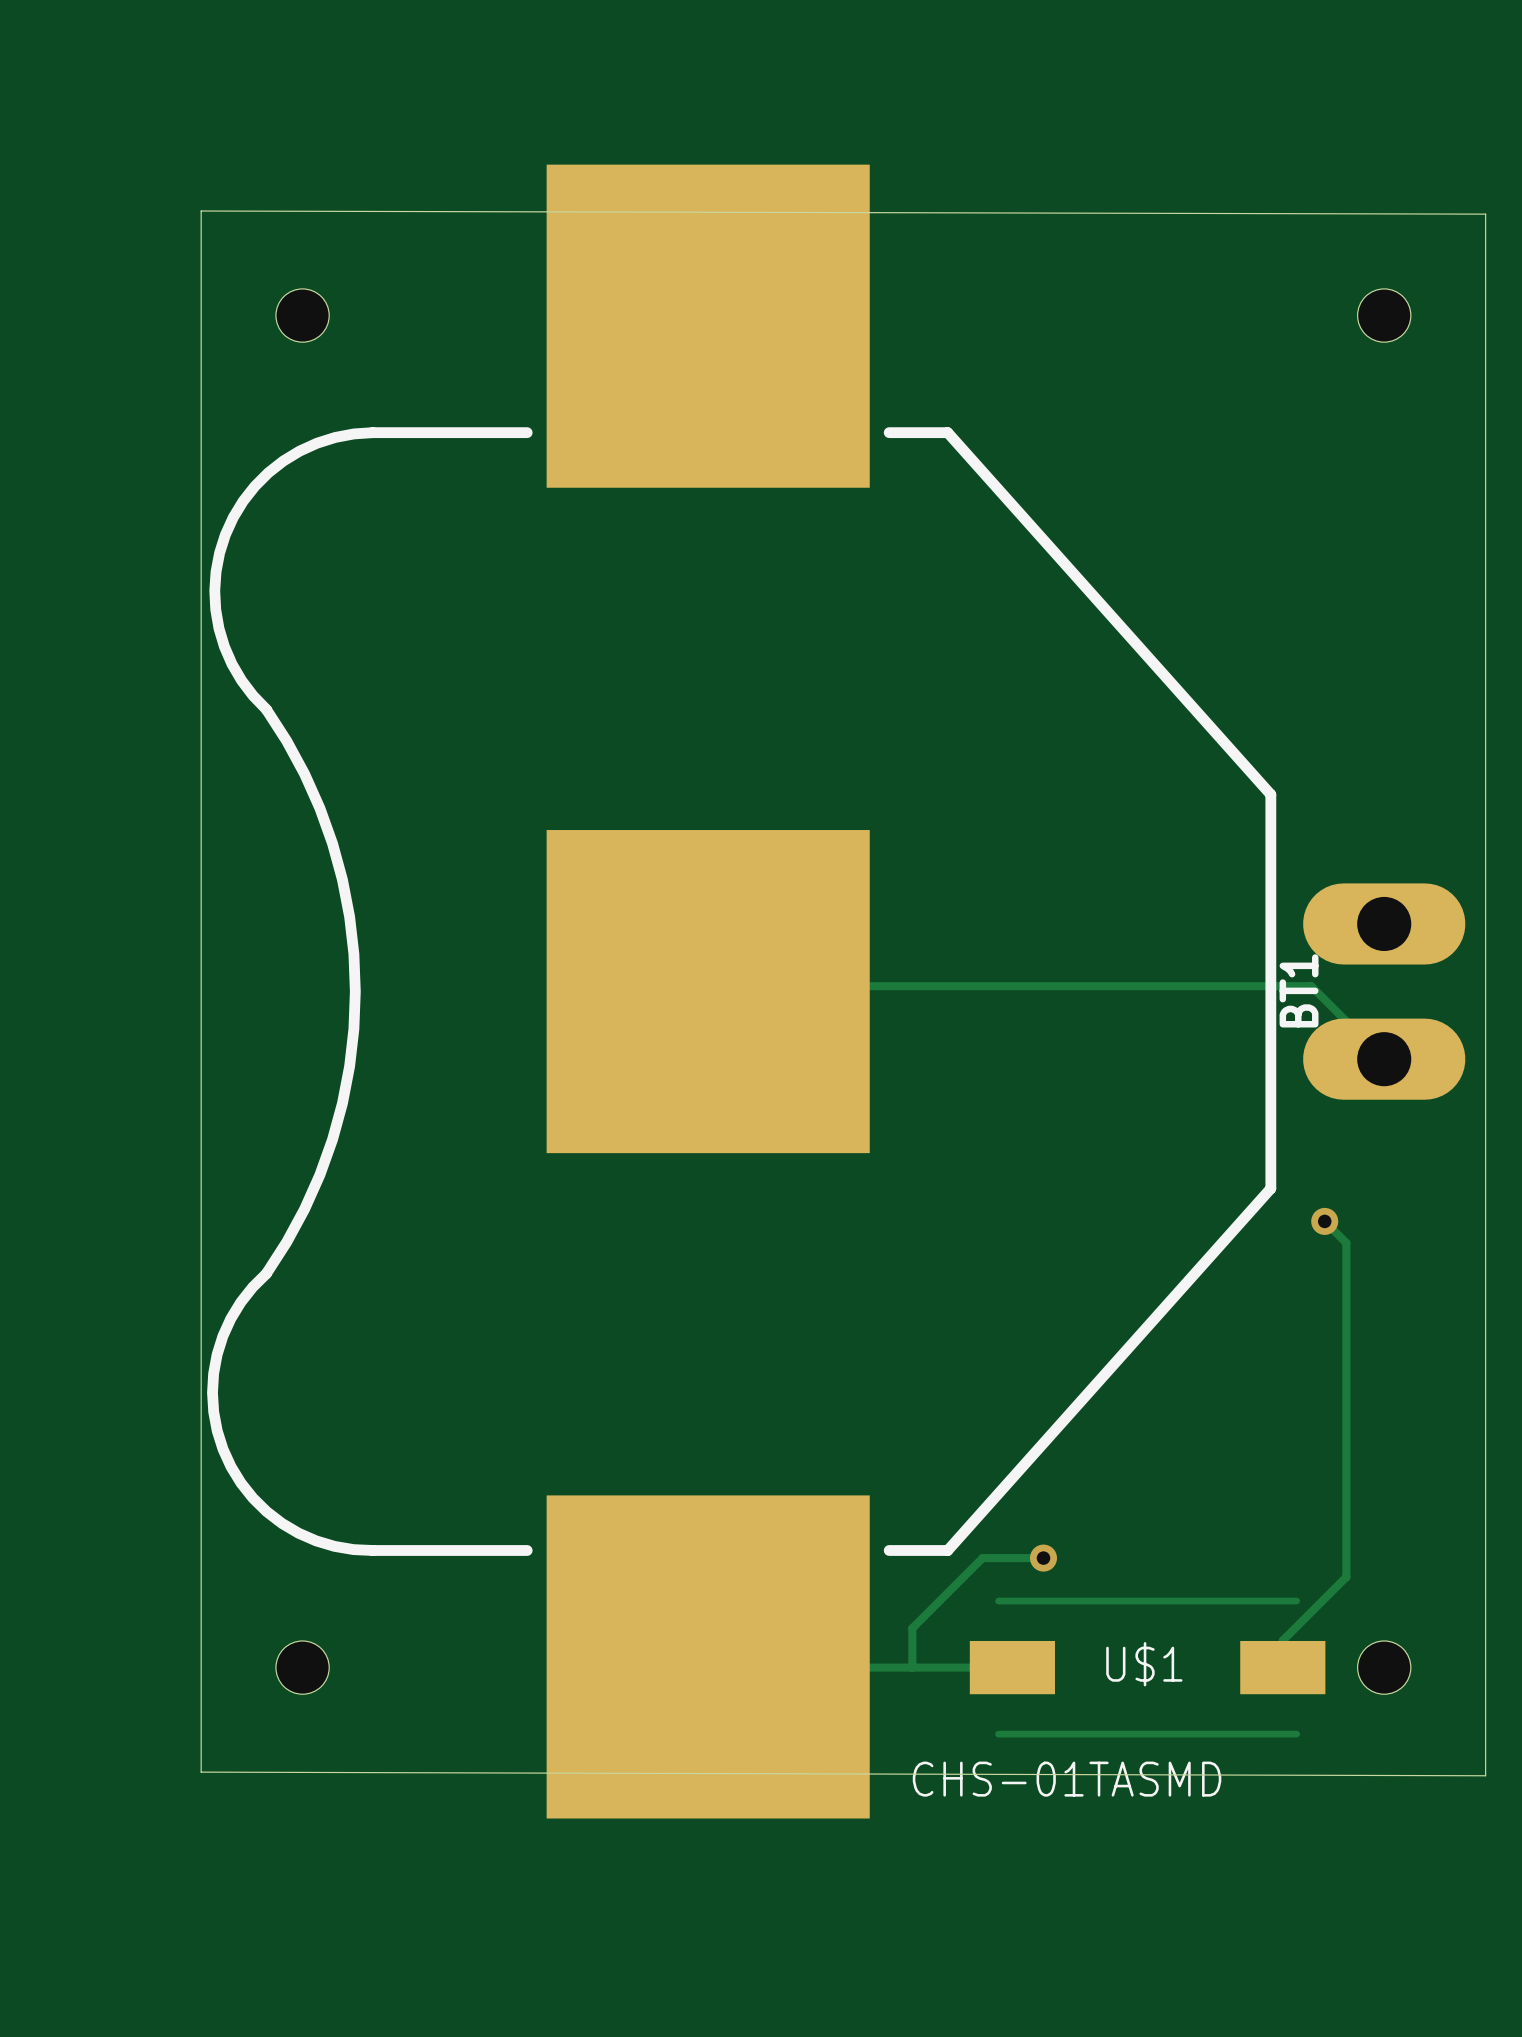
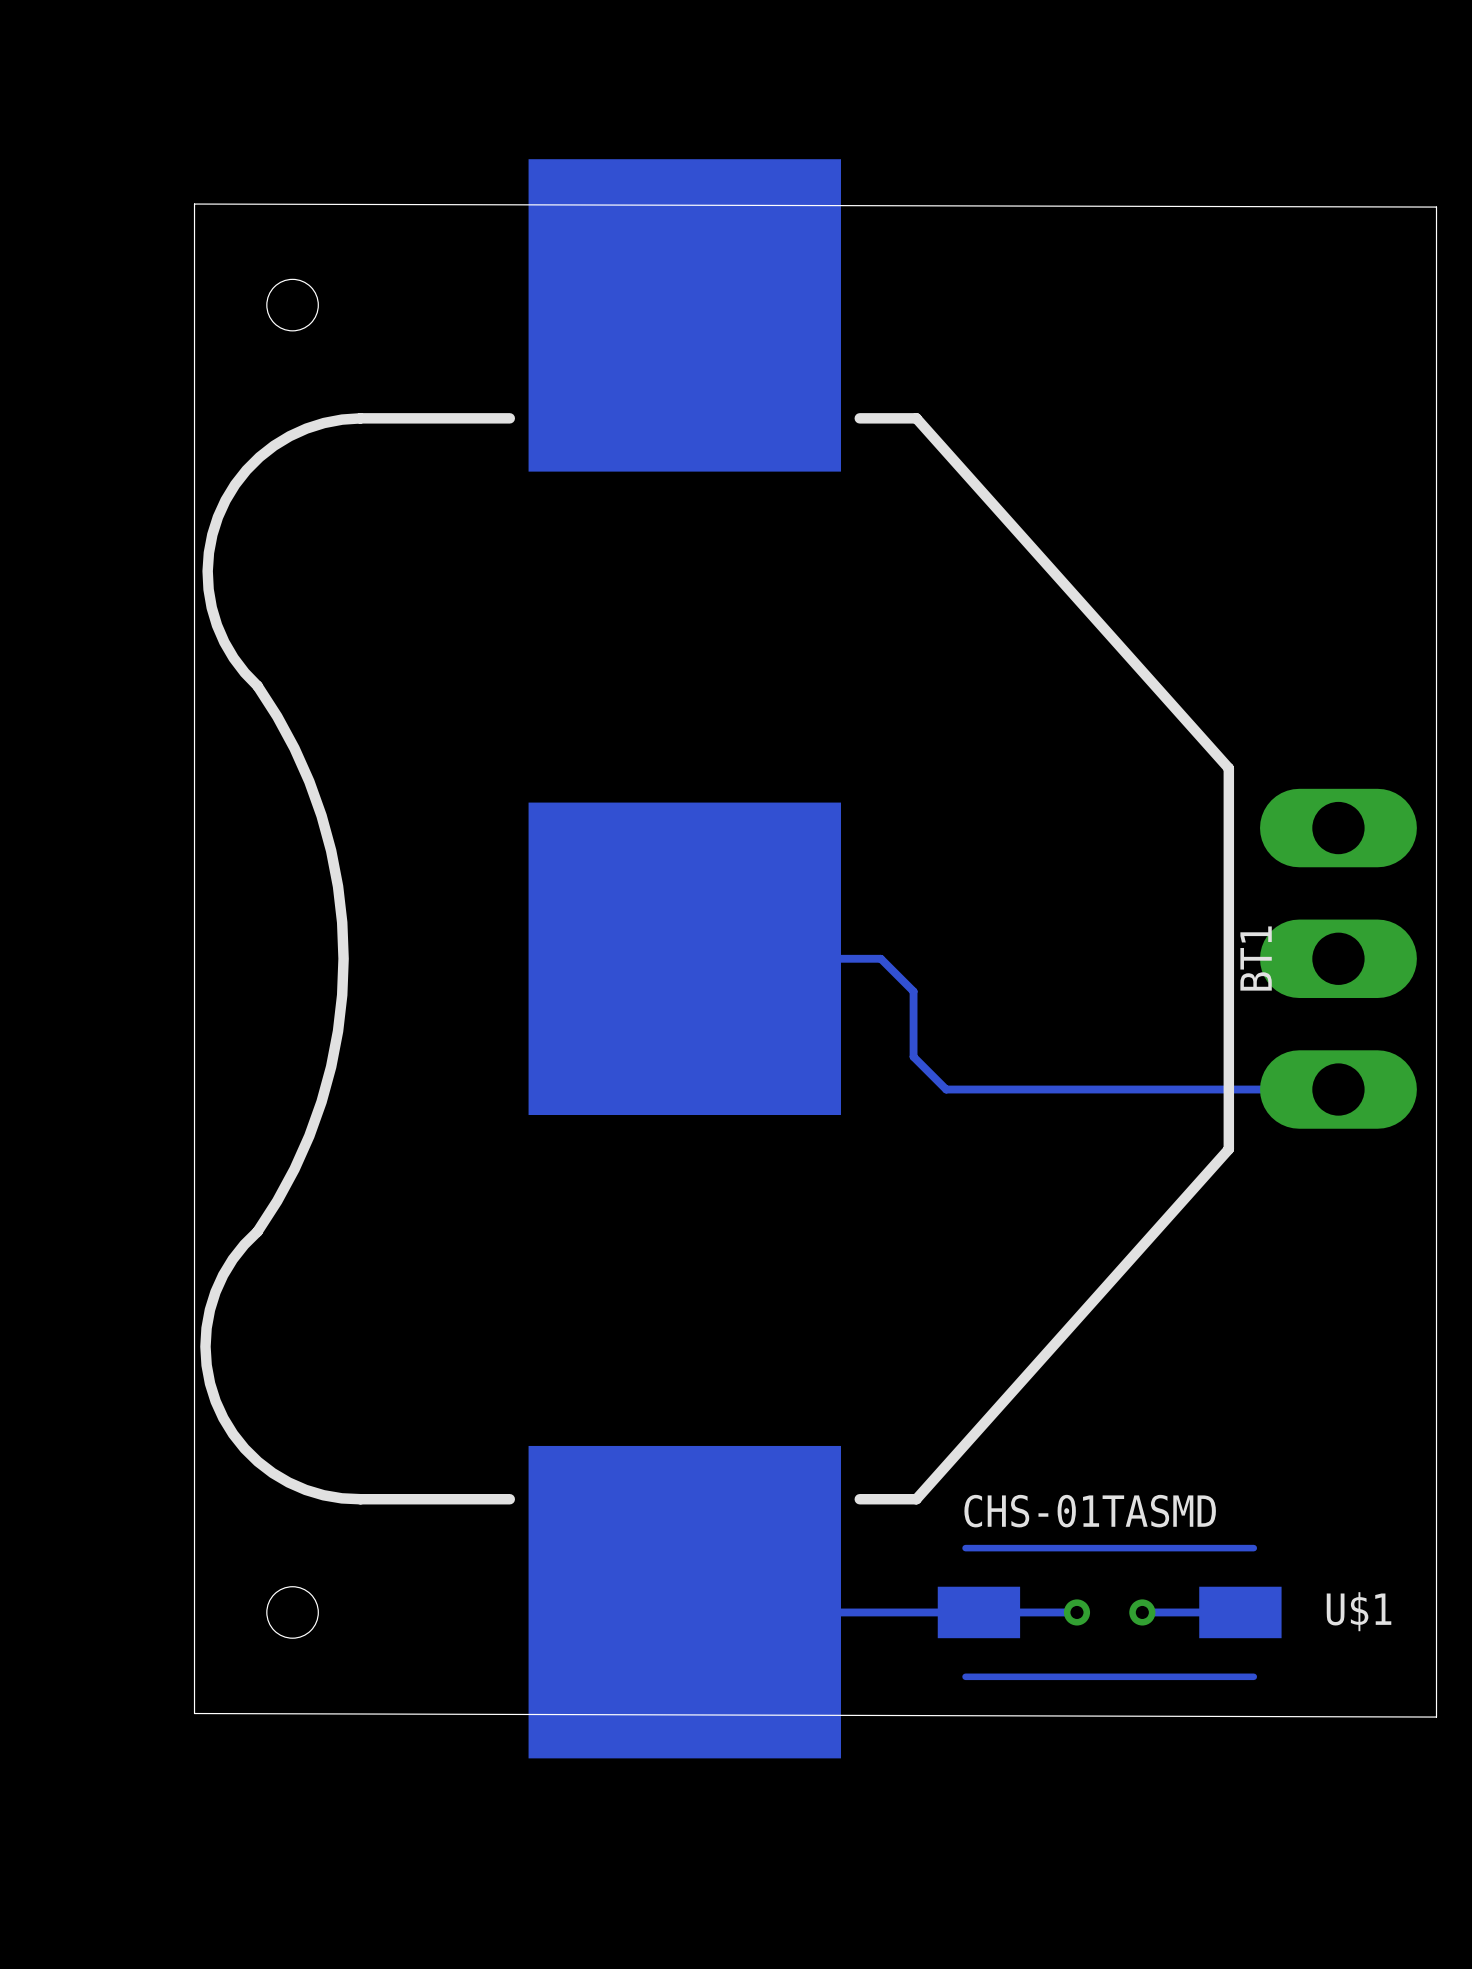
hole: (1384, 315) -> none
part footprint: [1303, 883, 1466, 1100] -> [1260, 788, 1417, 1129]
track: (708, 991) (709, 986) (1311, 986) (1384, 1059) -> (684, 958) (880, 958) (913, 991) (913, 1056) (946, 1089) (1338, 1089)
track: (1324, 1221) (1346, 1243) (1346, 1577) (1282, 1640) (1282, 1667) -> (1142, 1612) (1240, 1612)
via: (1324, 1221) -> none
track: (1043, 1558) (982, 1558) (912, 1628) (912, 1667) -> none
via: (1043, 1558) -> none
U$1 name position: U$1 (1144, 1664) -> U$1 (1359, 1611)
track: none -> (1076, 1612) (978, 1612)
via: none -> (1076, 1612)
via: none -> (1142, 1612)
hole: (1384, 1667) -> none
U$1 value position: CHS-01TASMD (1067, 1779) -> CHS-01TASMD (1090, 1511)

